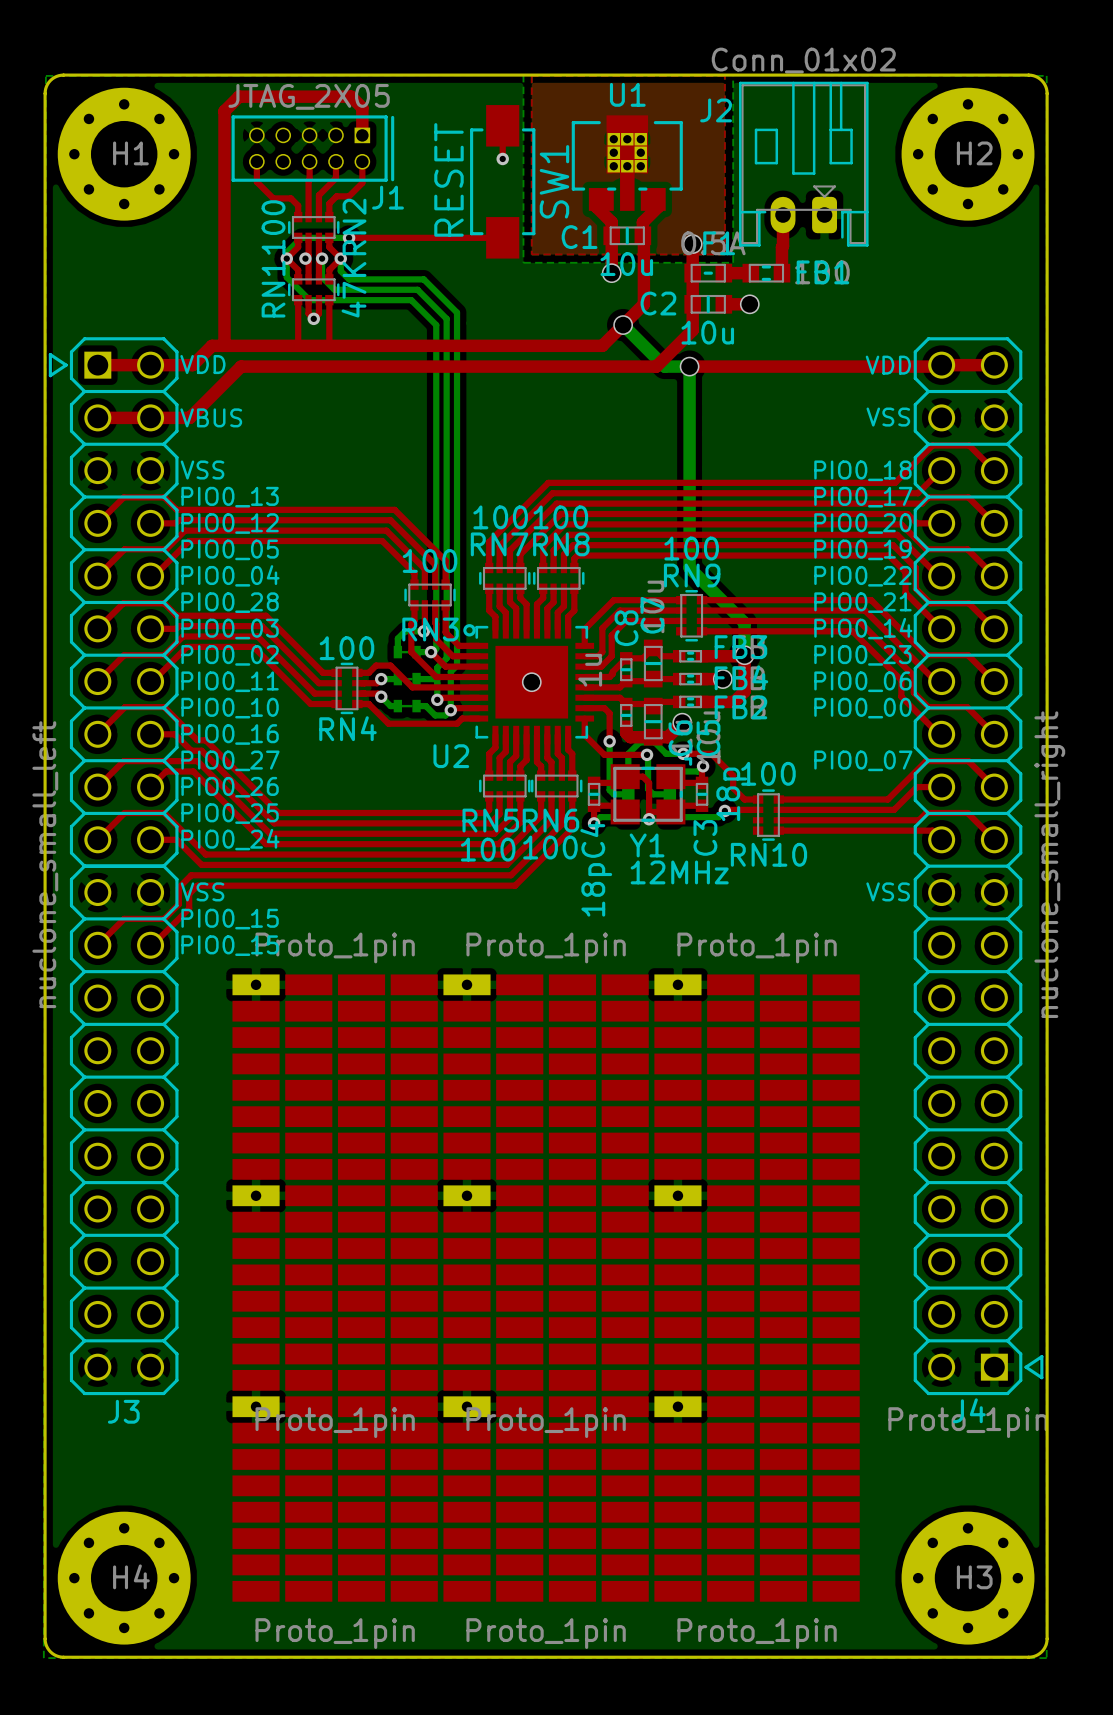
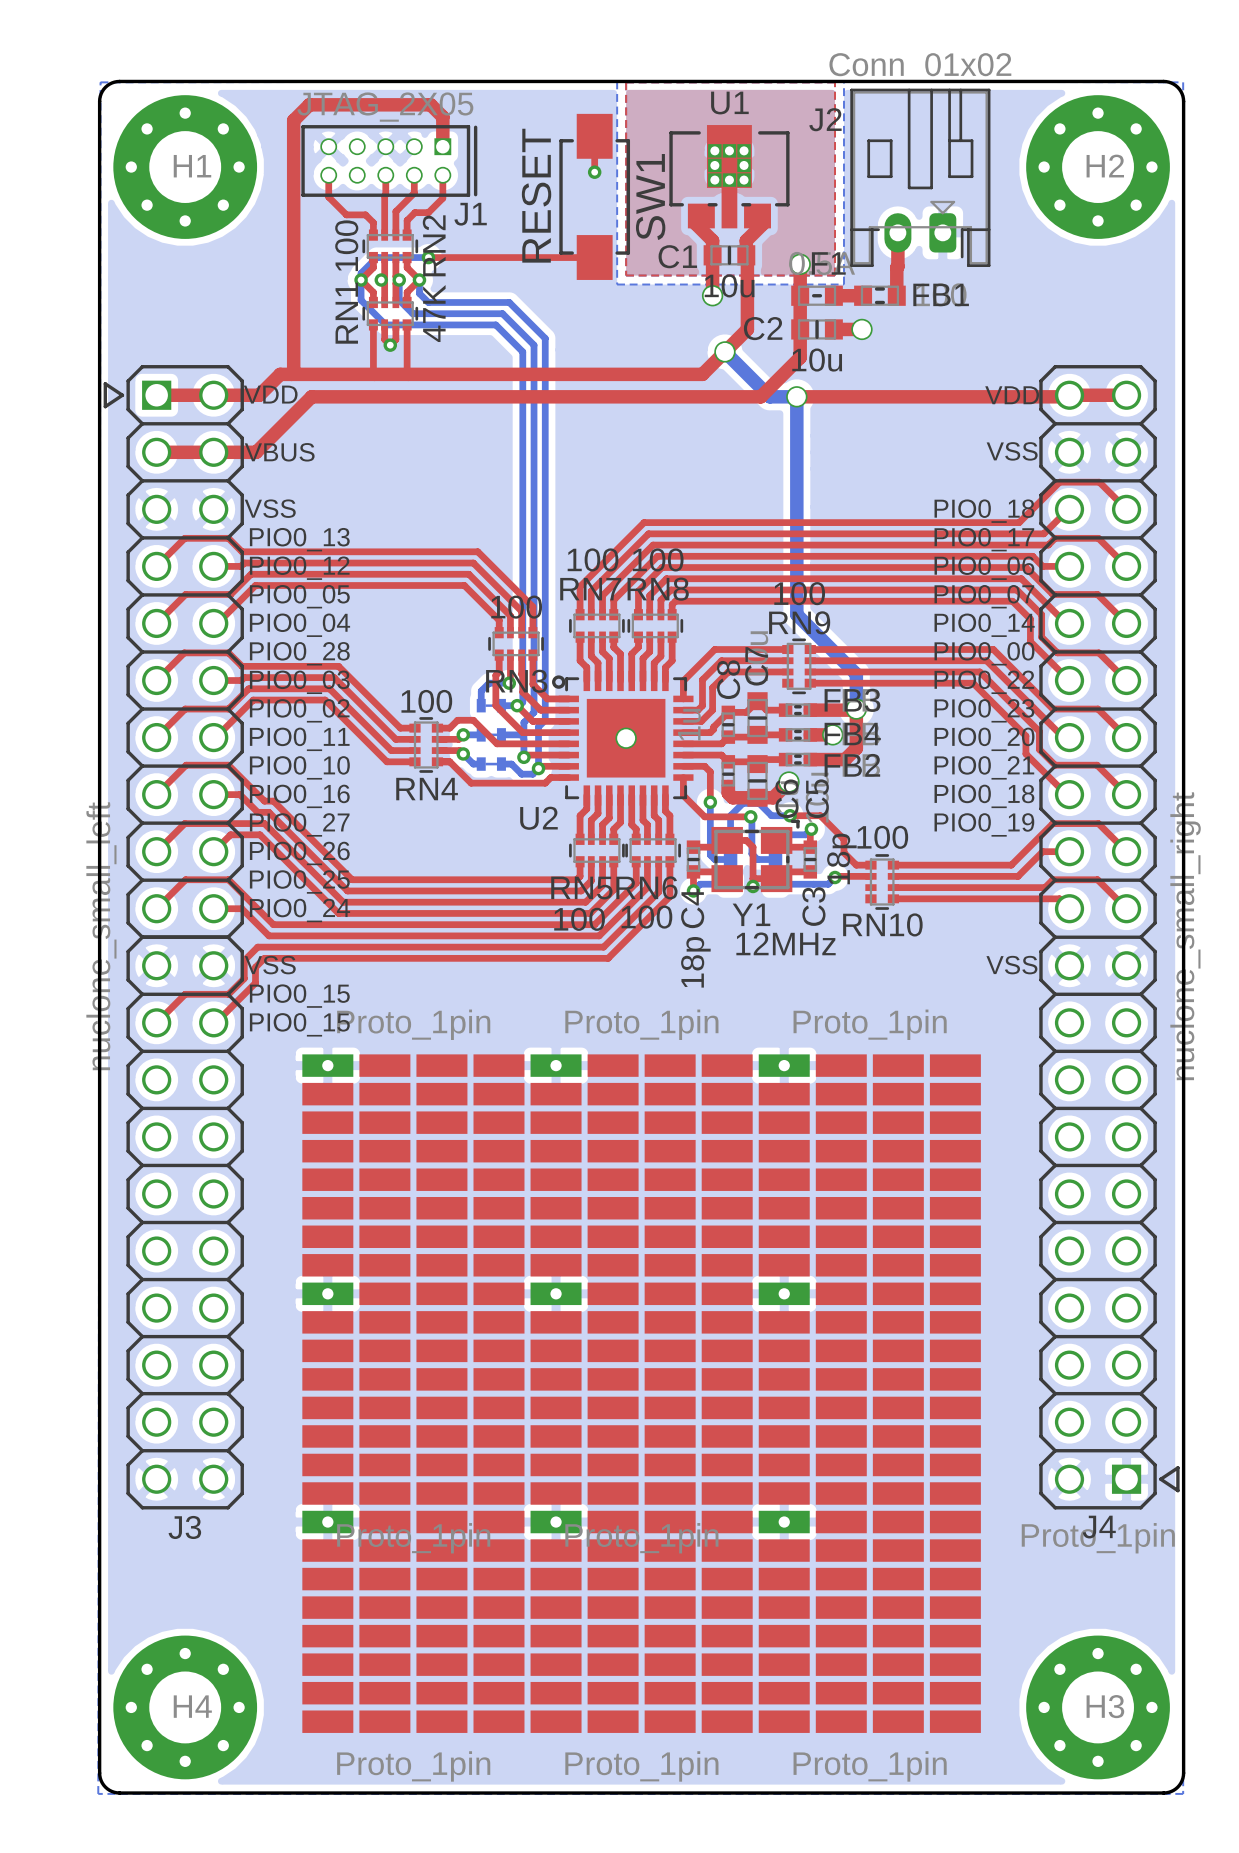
J4 footprint: [913, 337, 1044, 1396] -> [1039, 365, 1180, 1510]

